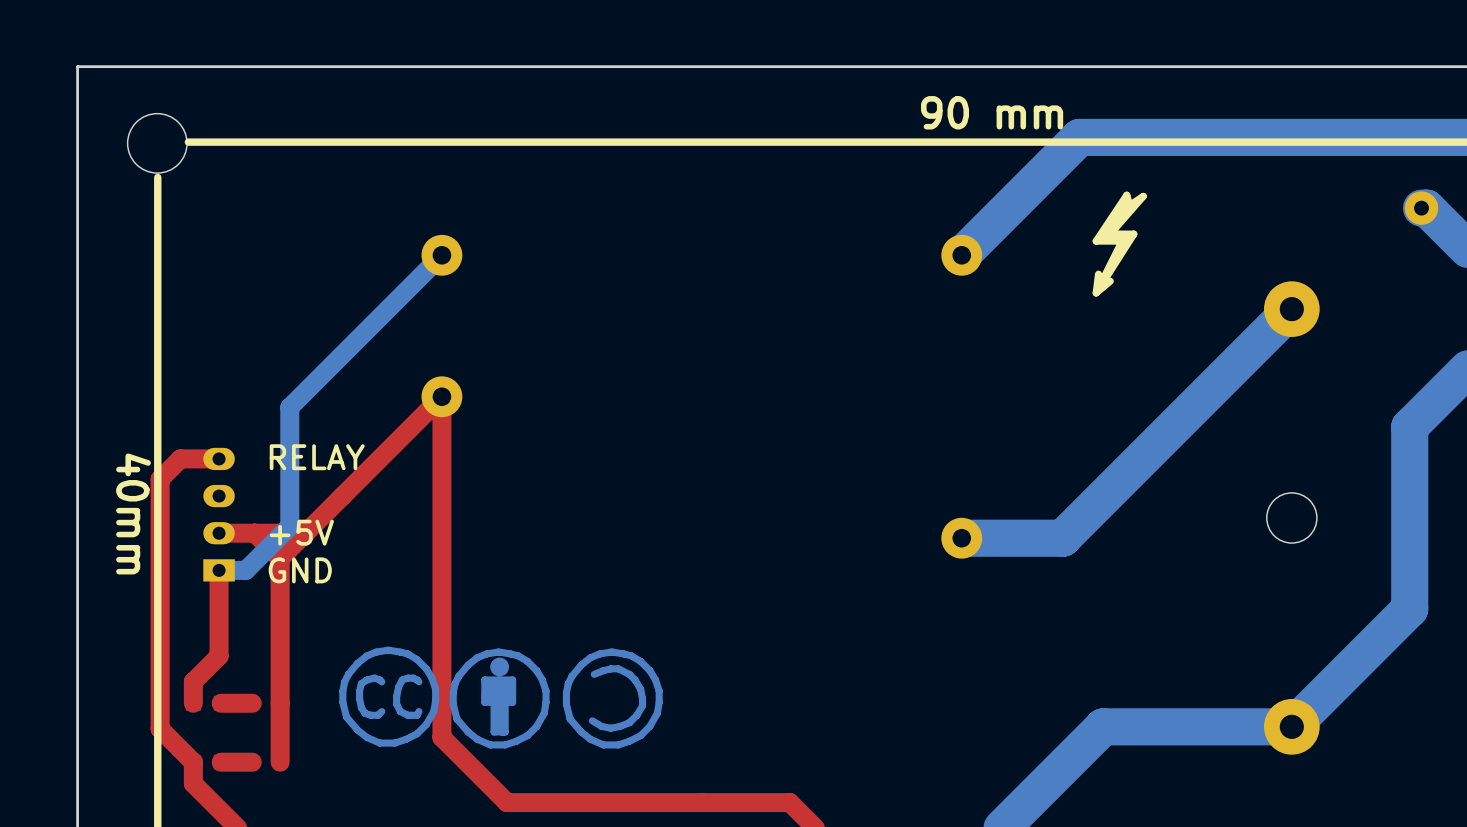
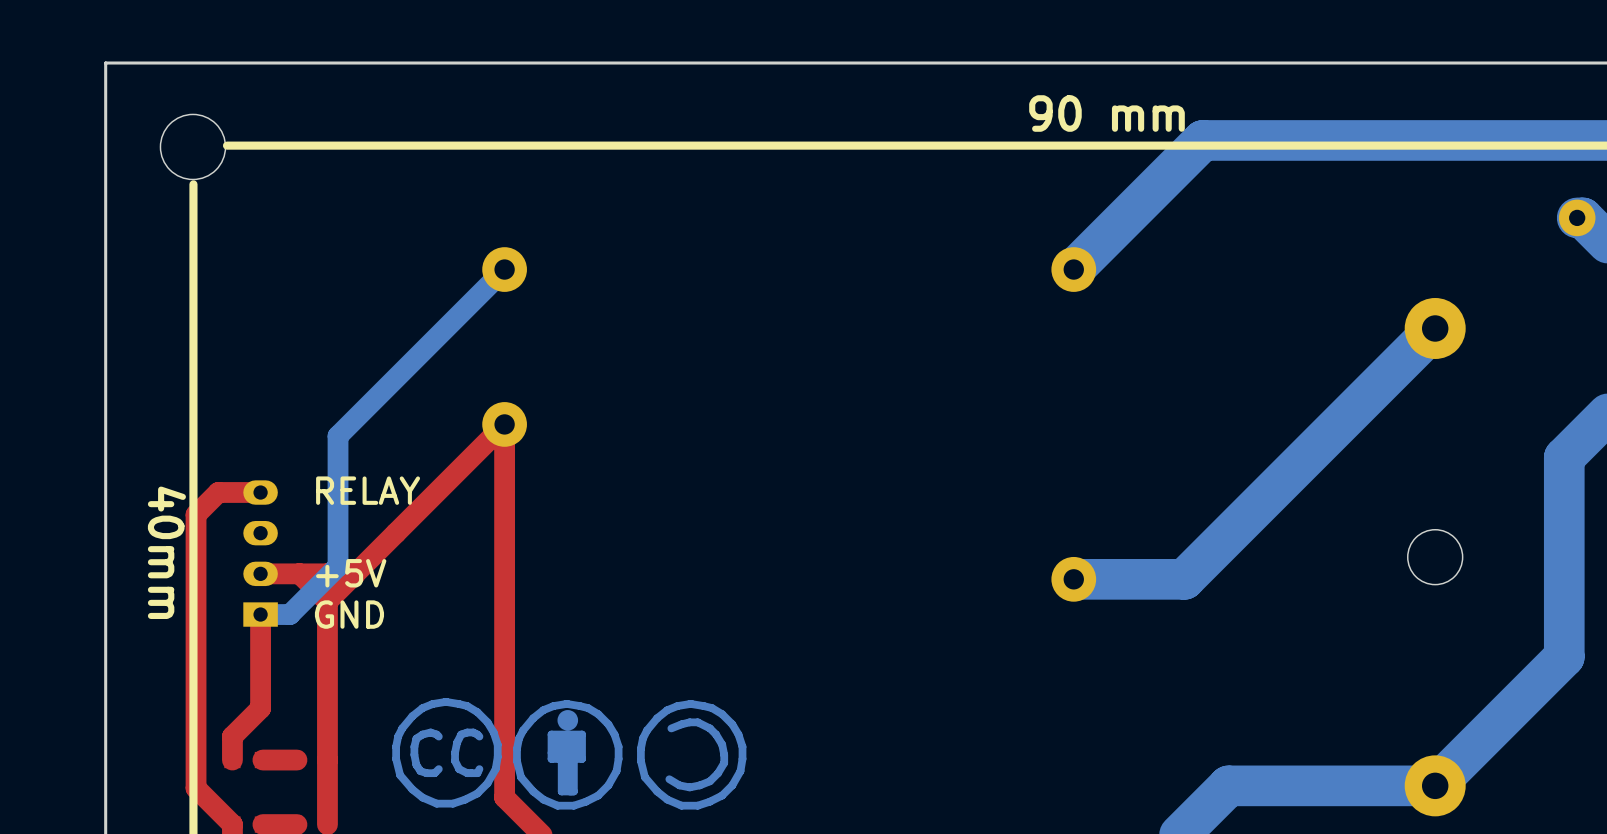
drawing: [1092, 191, 1147, 297] -> none

